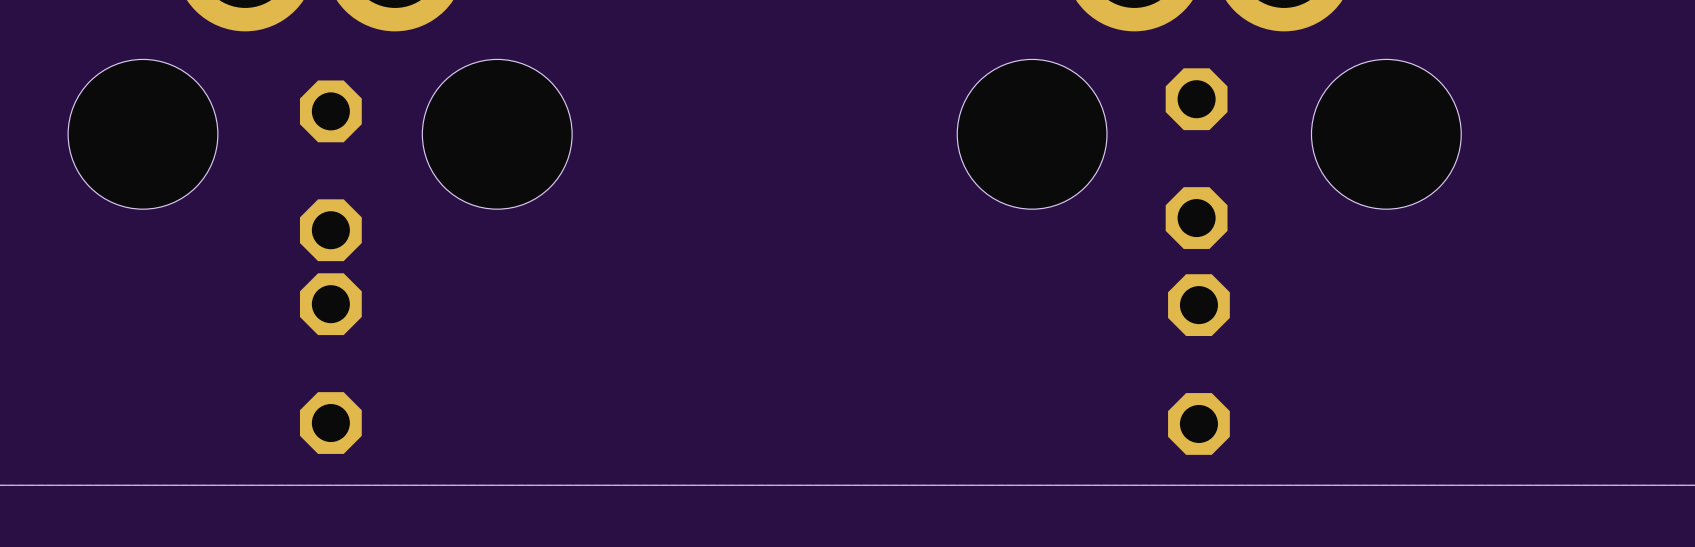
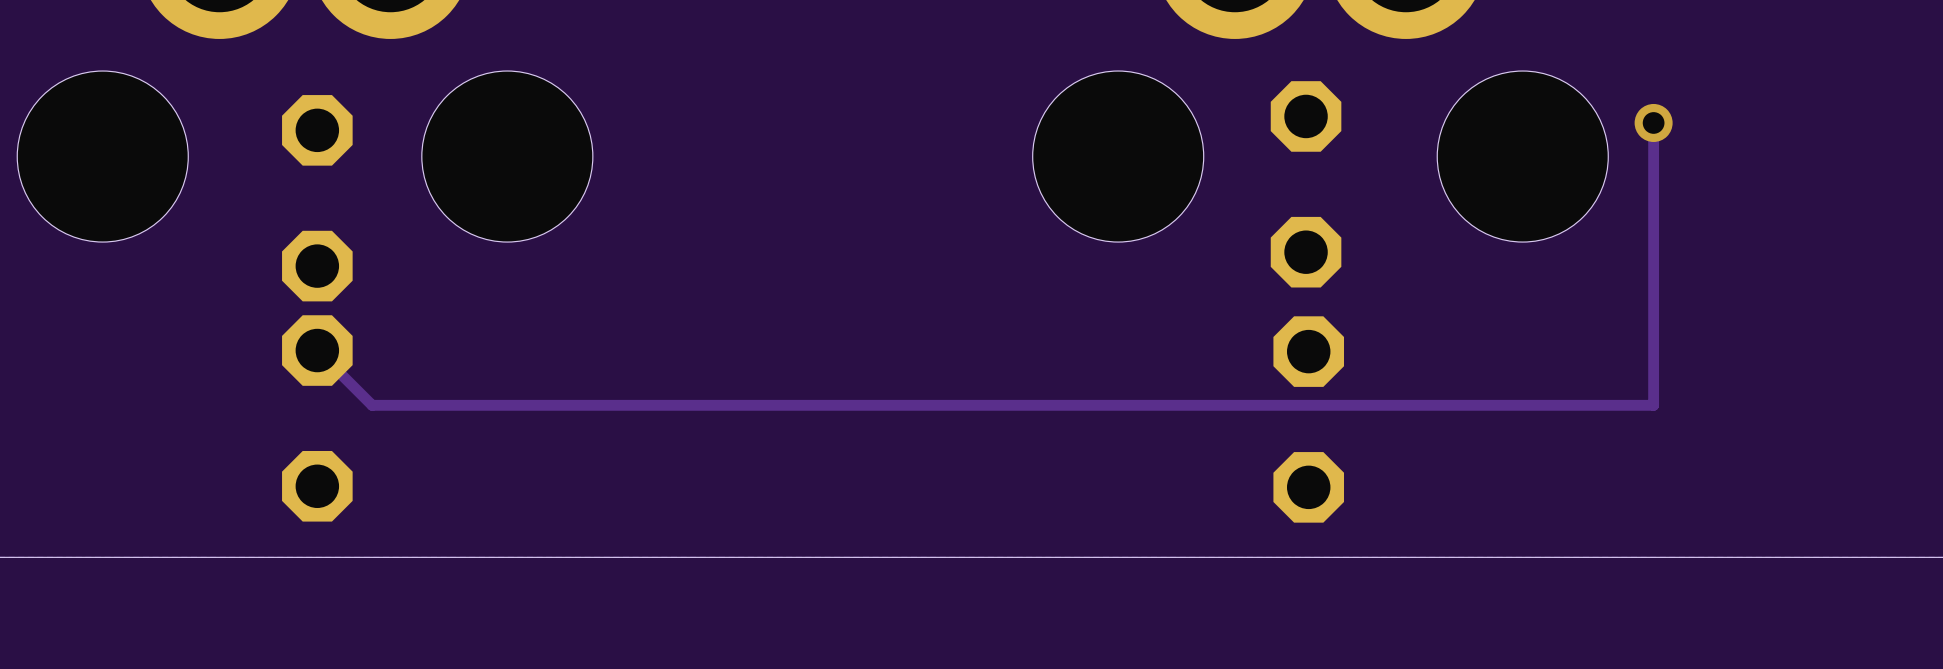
track: none -> (1653, 122) (1653, 405) (372, 405) (317, 351)
via: none -> (1653, 122)

